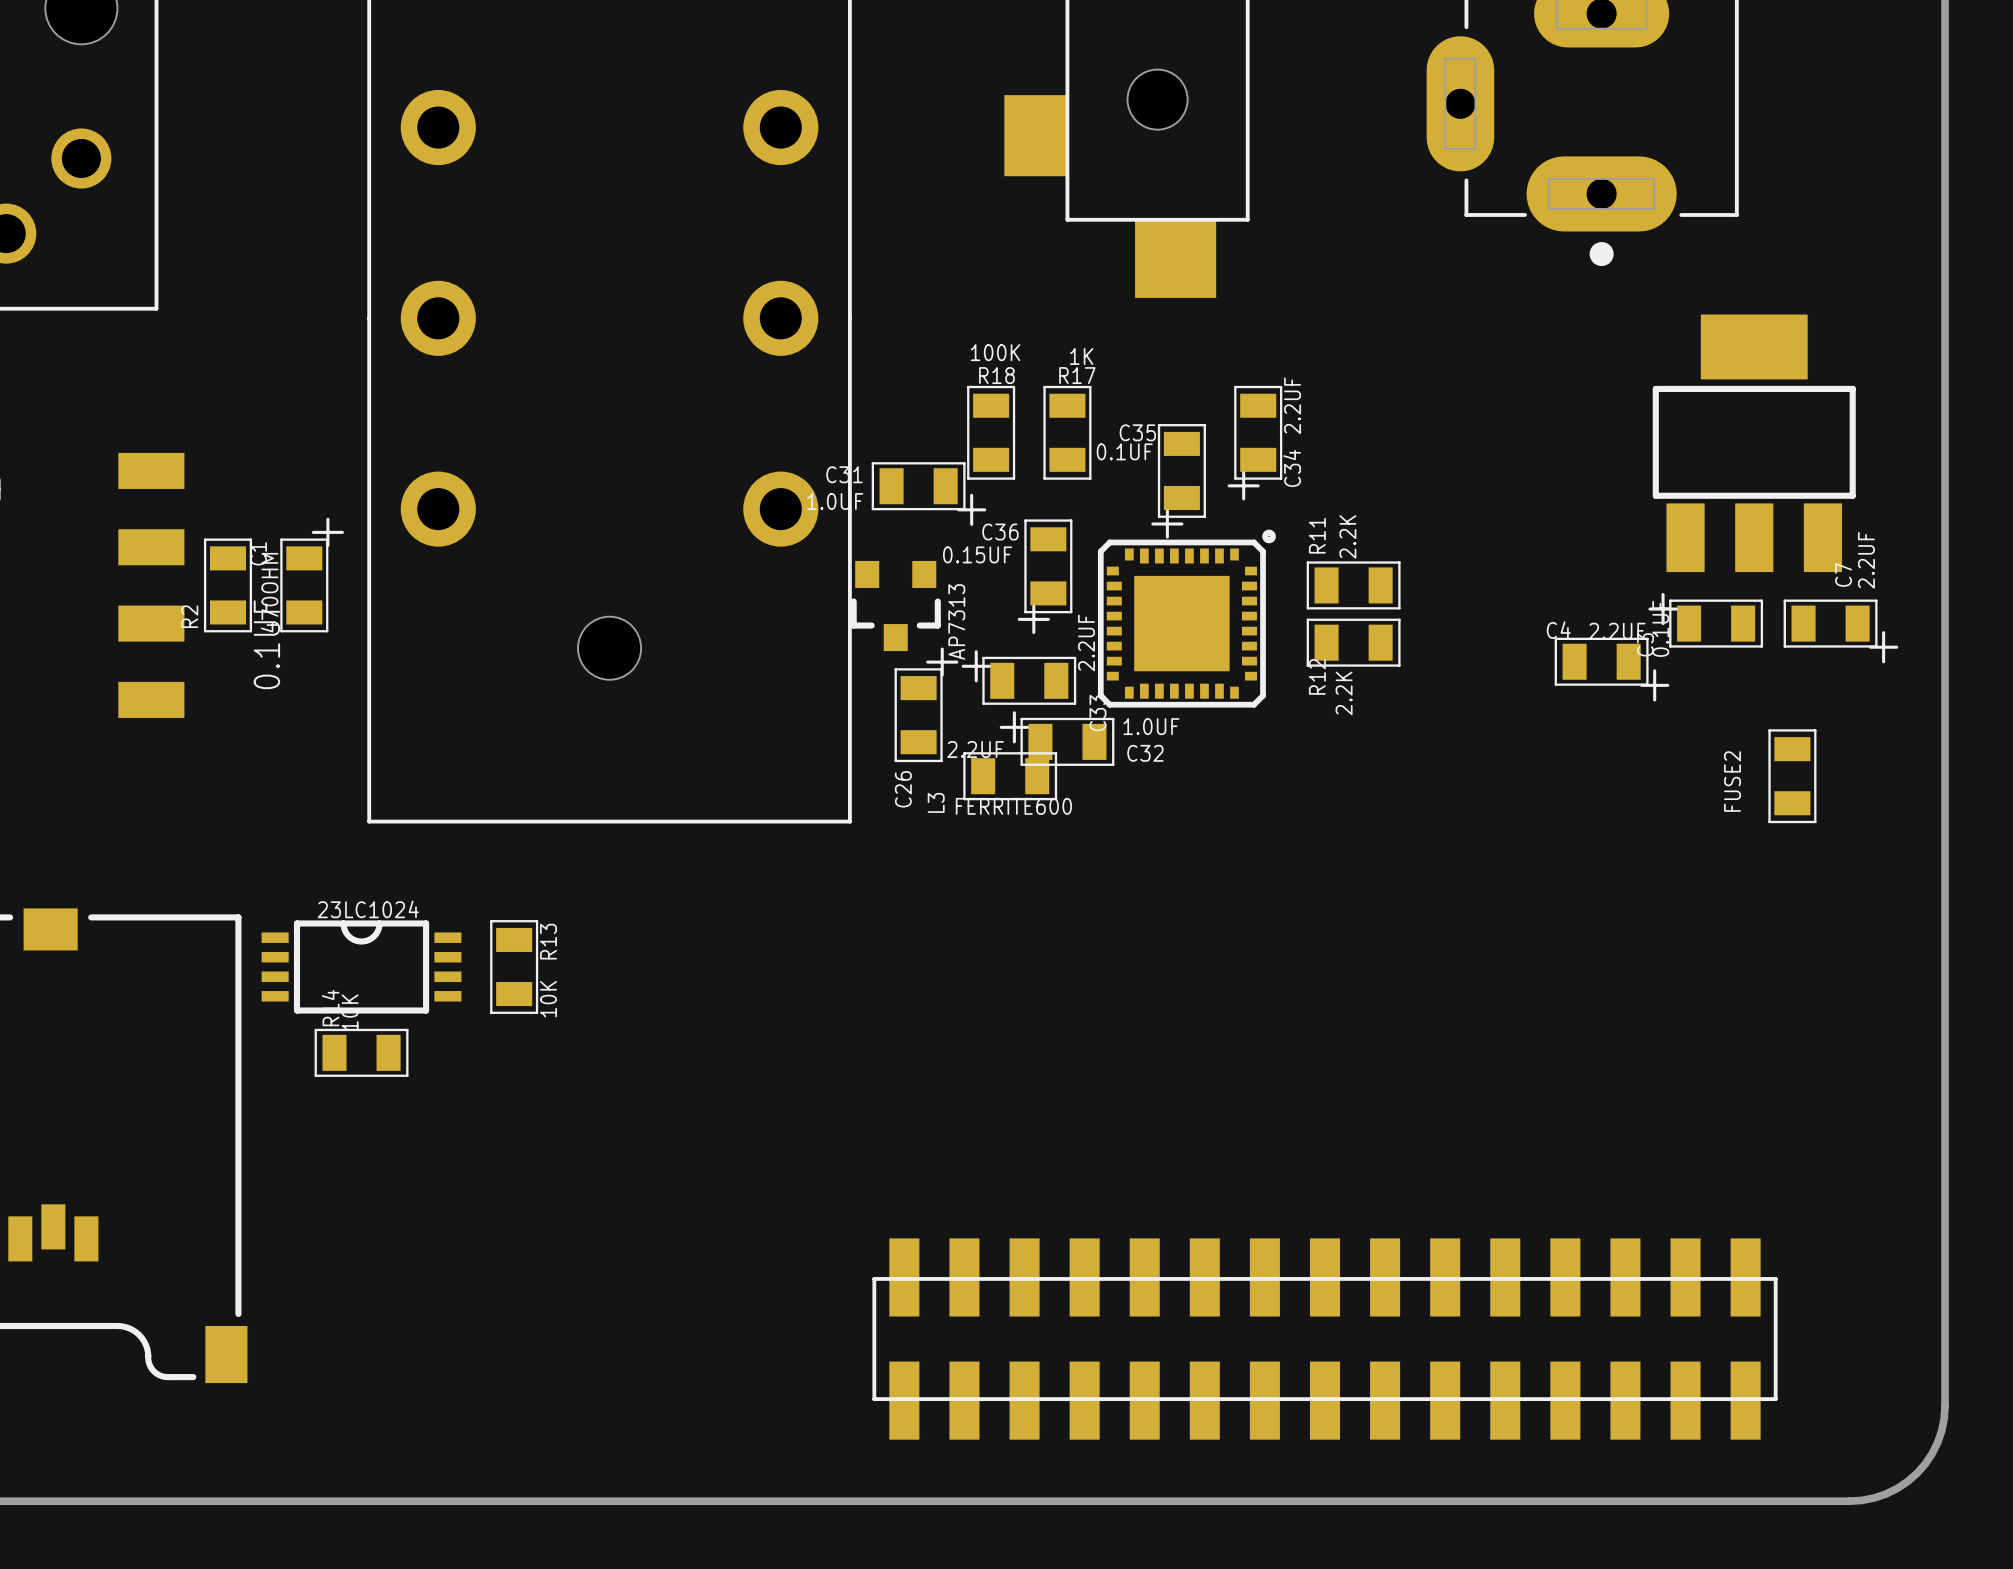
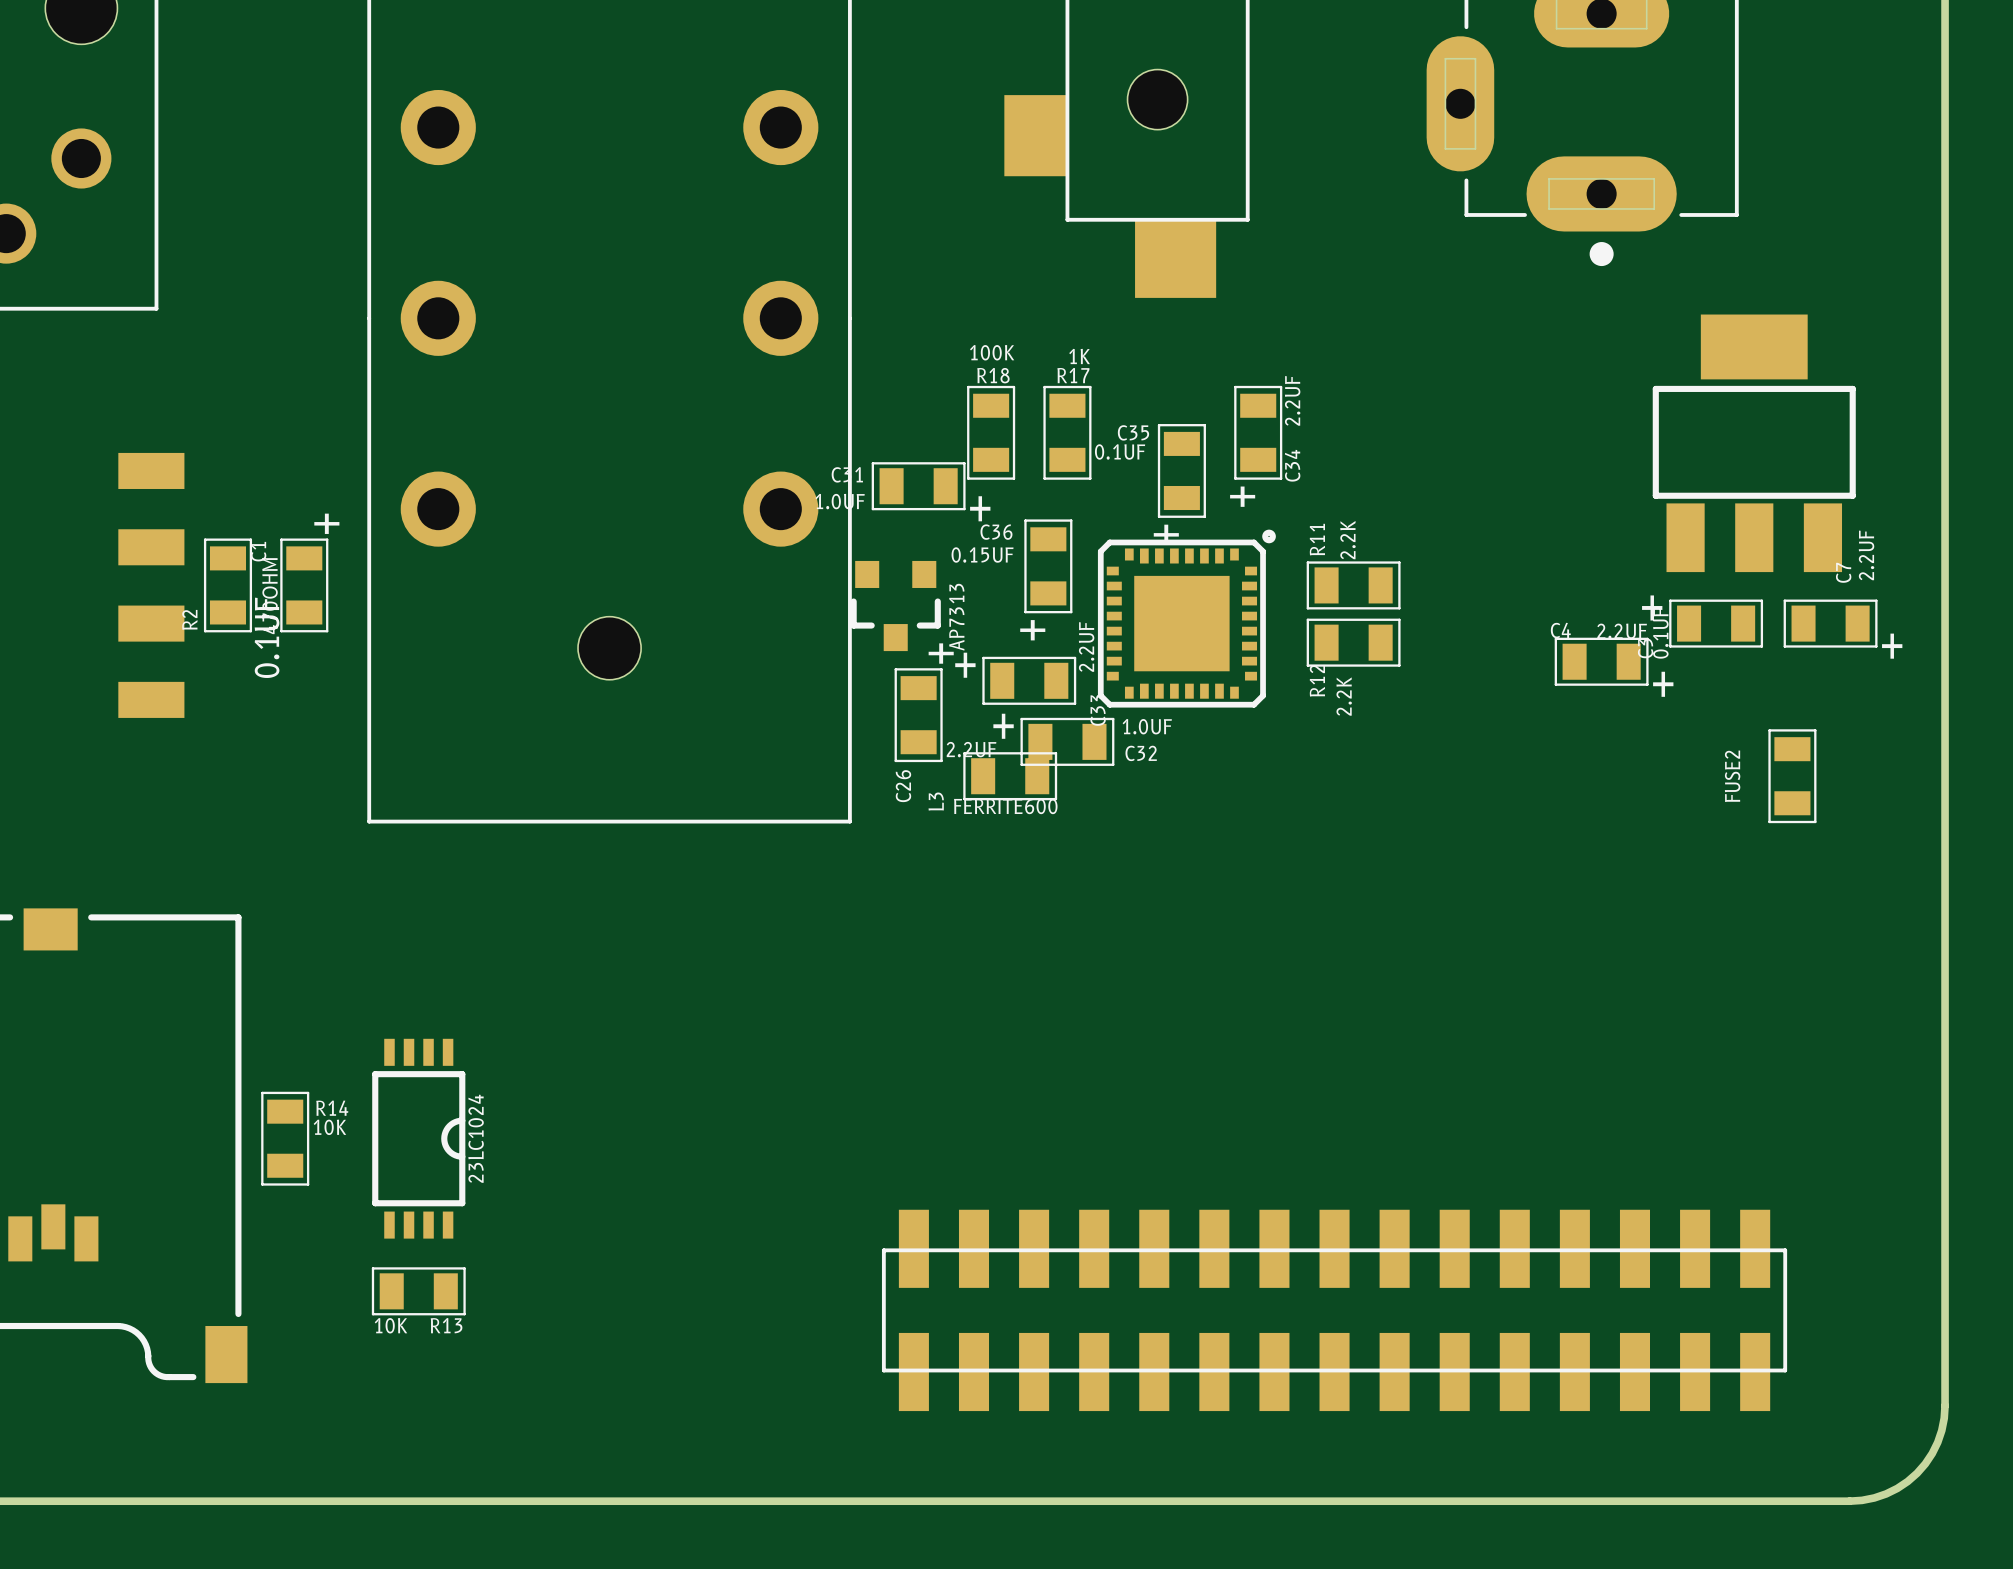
part rotation: 0° (361, 967) -> 90° clockwise (418, 1138)
part position: (361, 967) -> (418, 1138)
R13 rotation: 0° (514, 967) -> 90° clockwise (418, 1291)
R13 position: (514, 967) -> (418, 1291)
R14 rotation: 0° (361, 1052) -> 90° clockwise (285, 1138)
R14 position: (361, 1052) -> (285, 1138)
part position: (1325, 1339) -> (1334, 1310)

